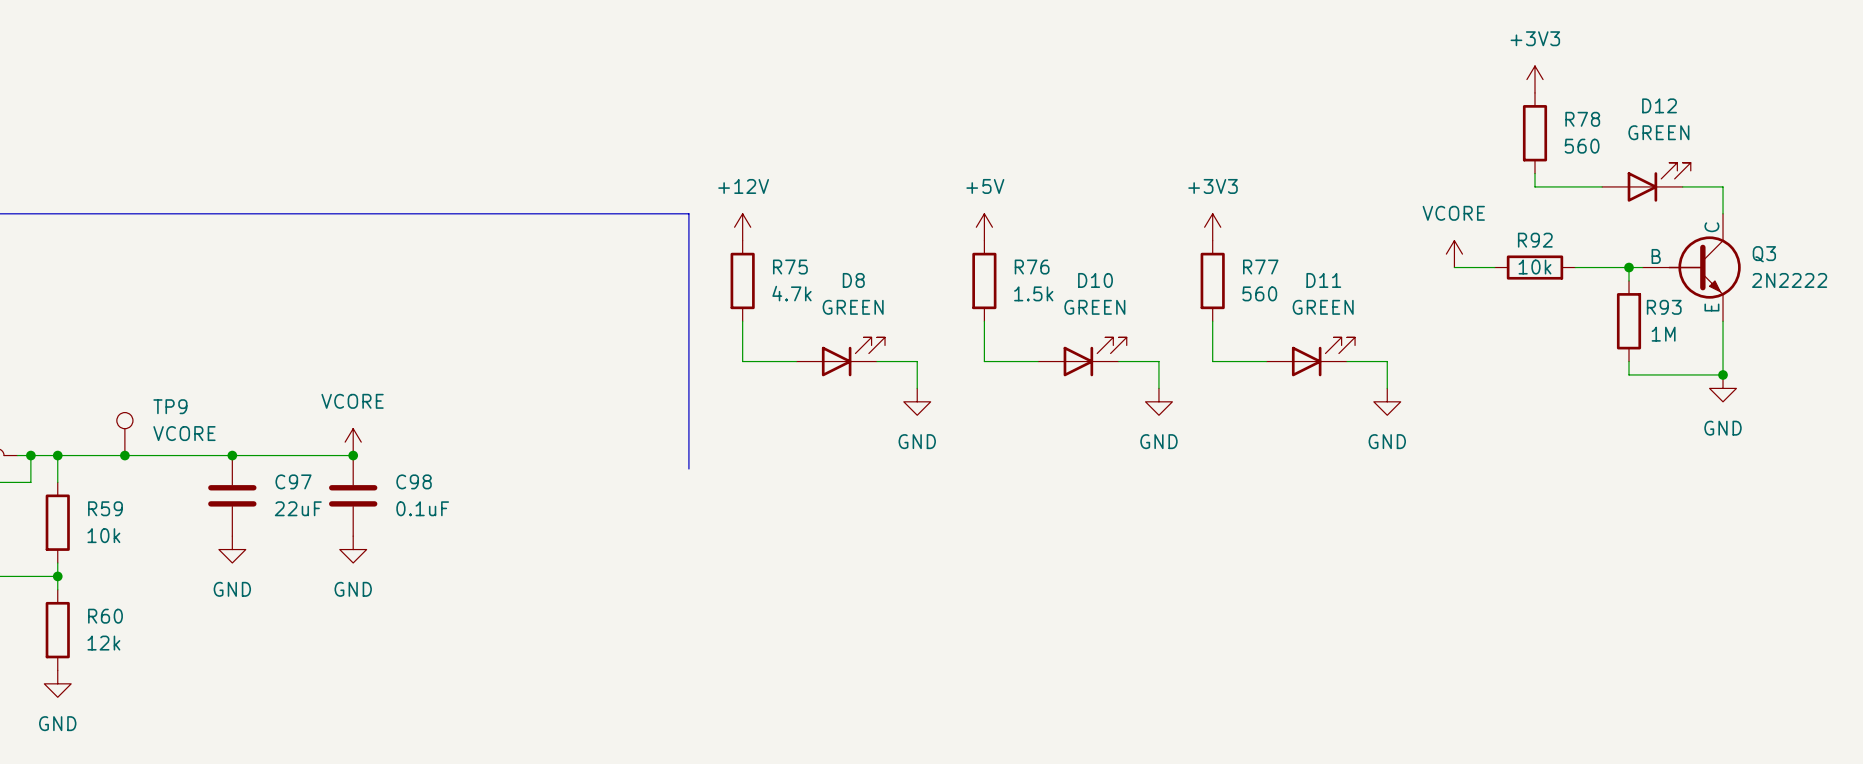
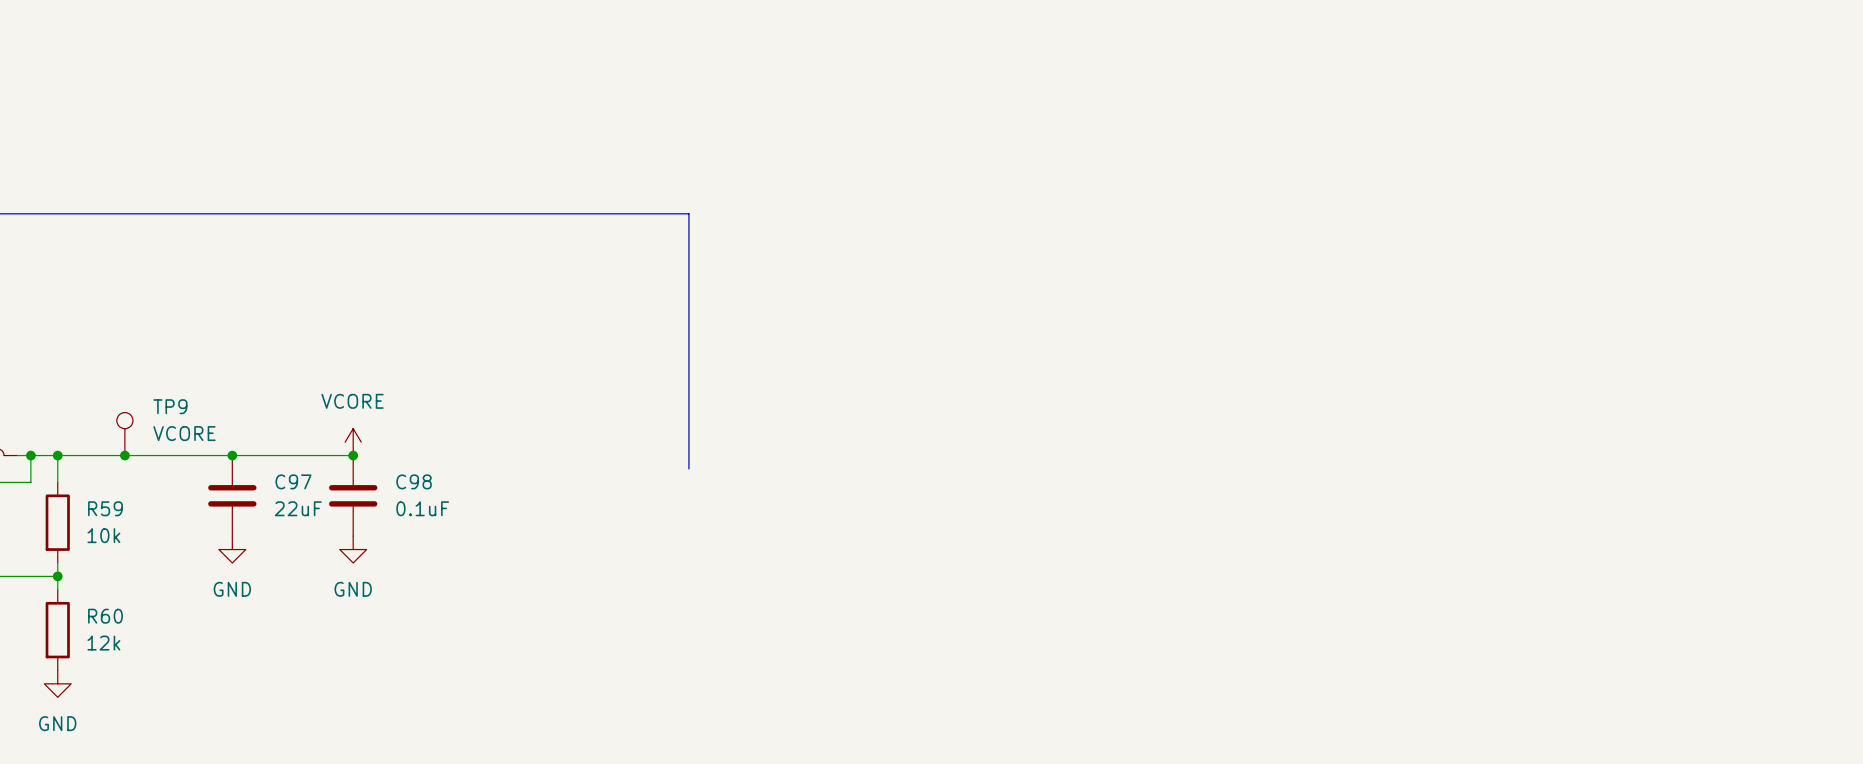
power symbol: +3V3 (1534, 79) -> none
R78: 560 (1534, 133) -> none
wire: (1534, 173) (1534, 186) (1602, 186) -> none
D12: GREEN (1646, 182) -> none
wire: (1682, 186) (1723, 186) (1723, 213) -> none
power symbol: +12V (742, 227) -> none
power symbol: +5V (984, 227) -> none
power symbol: +3V3 (1212, 227) -> none
power symbol: VCORE (1454, 254) -> none
wire: (1454, 267) (1494, 267) -> none
R92: 10k (1534, 267) -> none
wire: (1575, 267) (1642, 267) -> none
wire: (1629, 267) (1629, 280) -> none
junction: (1629, 267) -> none
Q3: 2N2222 (1691, 267) -> none
R75: 4.7k (742, 280) -> none
R76: 1.5k (984, 280) -> none
R77: 560 (1212, 280) -> none
wire: (742, 321) (742, 361) (796, 361) -> none
wire: (984, 321) (984, 361) (1038, 361) -> none
wire: (1212, 321) (1212, 361) (1266, 361) -> none
R93: 1M (1629, 321) -> none
wire: (1723, 321) (1723, 374) (1629, 374) (1629, 361) -> none
D8: GREEN (840, 356) -> none
D10: GREEN (1082, 356) -> none
D11: GREEN (1310, 356) -> none
wire: (876, 361) (917, 361) (917, 388) -> none
wire: (1118, 361) (1158, 361) (1158, 388) -> none
wire: (1346, 361) (1387, 361) (1387, 388) -> none
junction: (1723, 374) -> none
power symbol: GND (1723, 388) -> none
power symbol: GND (917, 401) -> none
power symbol: GND (1158, 401) -> none
power symbol: GND (1387, 401) -> none

